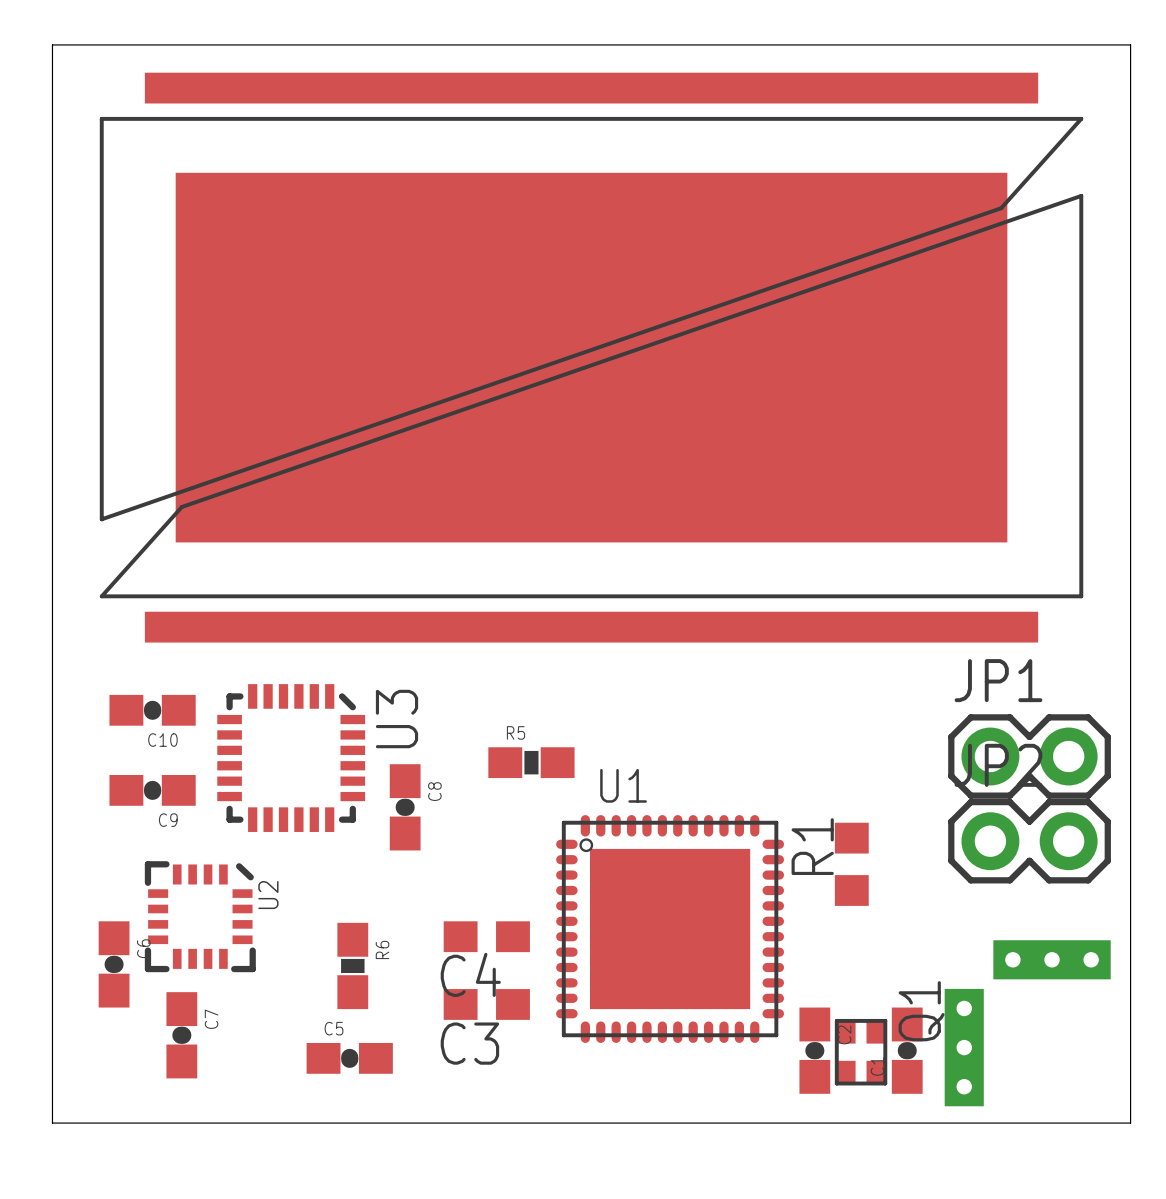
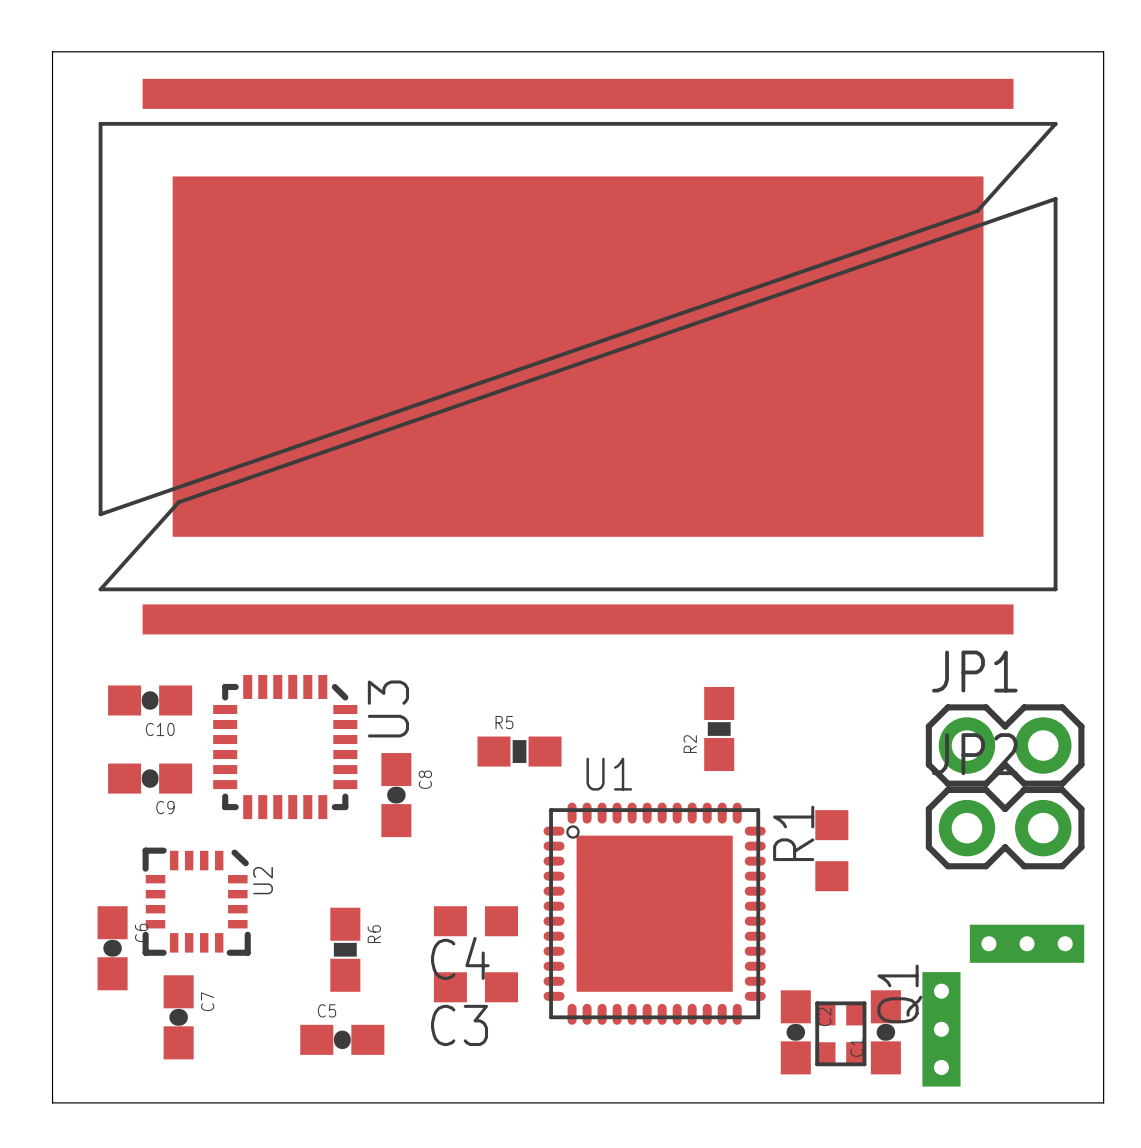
R2: none -> (719, 729)

